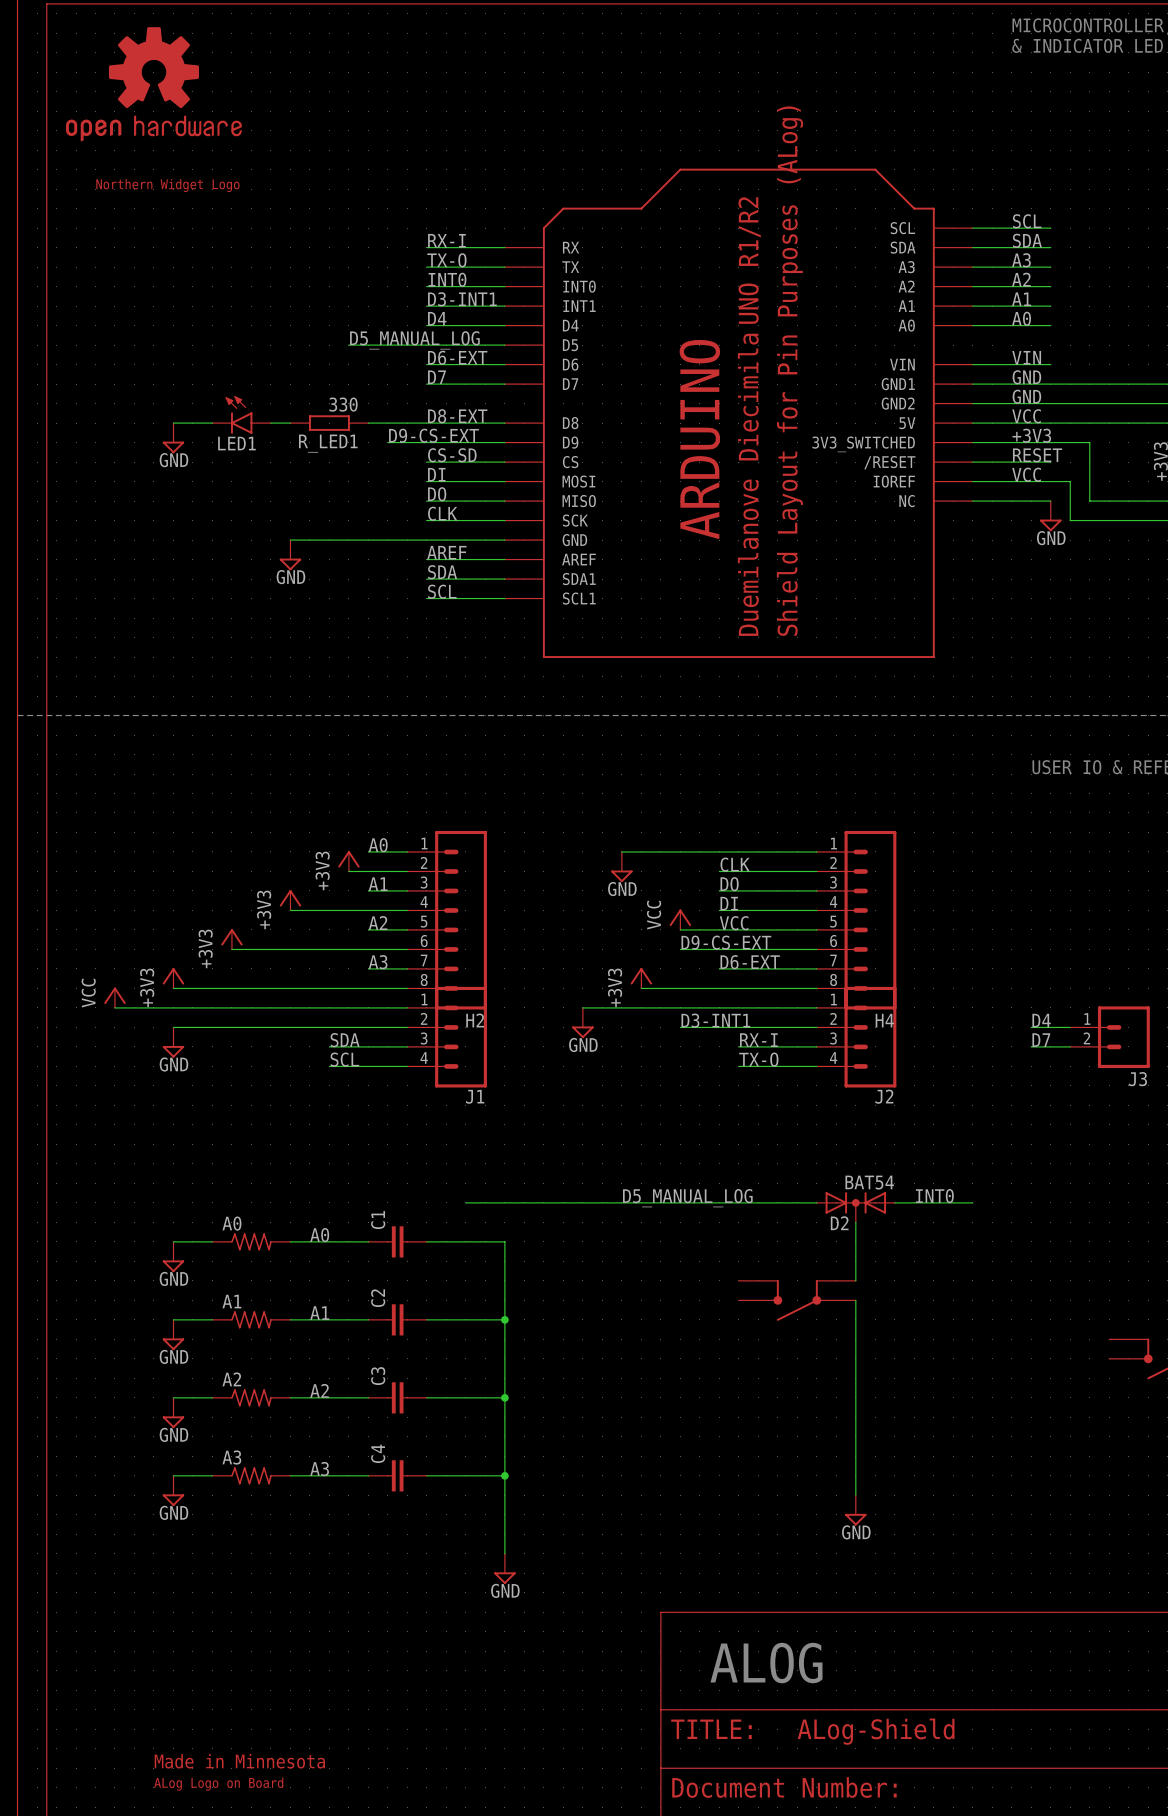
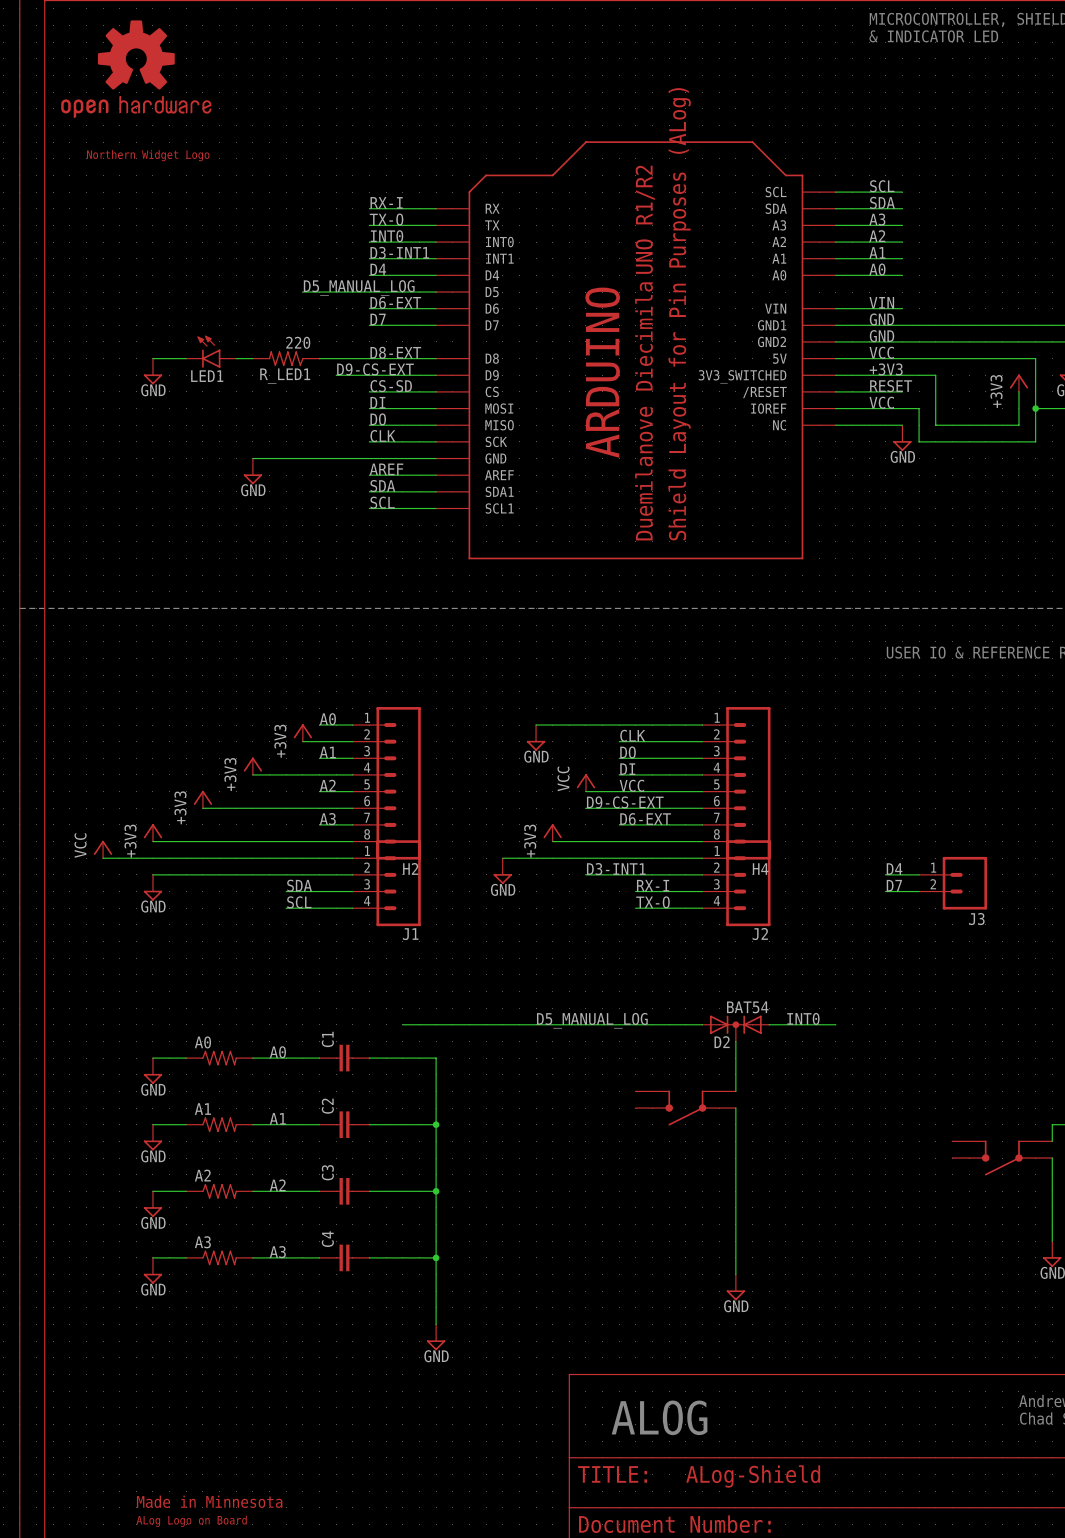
R_LED1 value: 330 (343, 404) -> 220 (298, 342)
R_LED1 symbol: [290, 415, 369, 431] -> [252, 351, 320, 366]

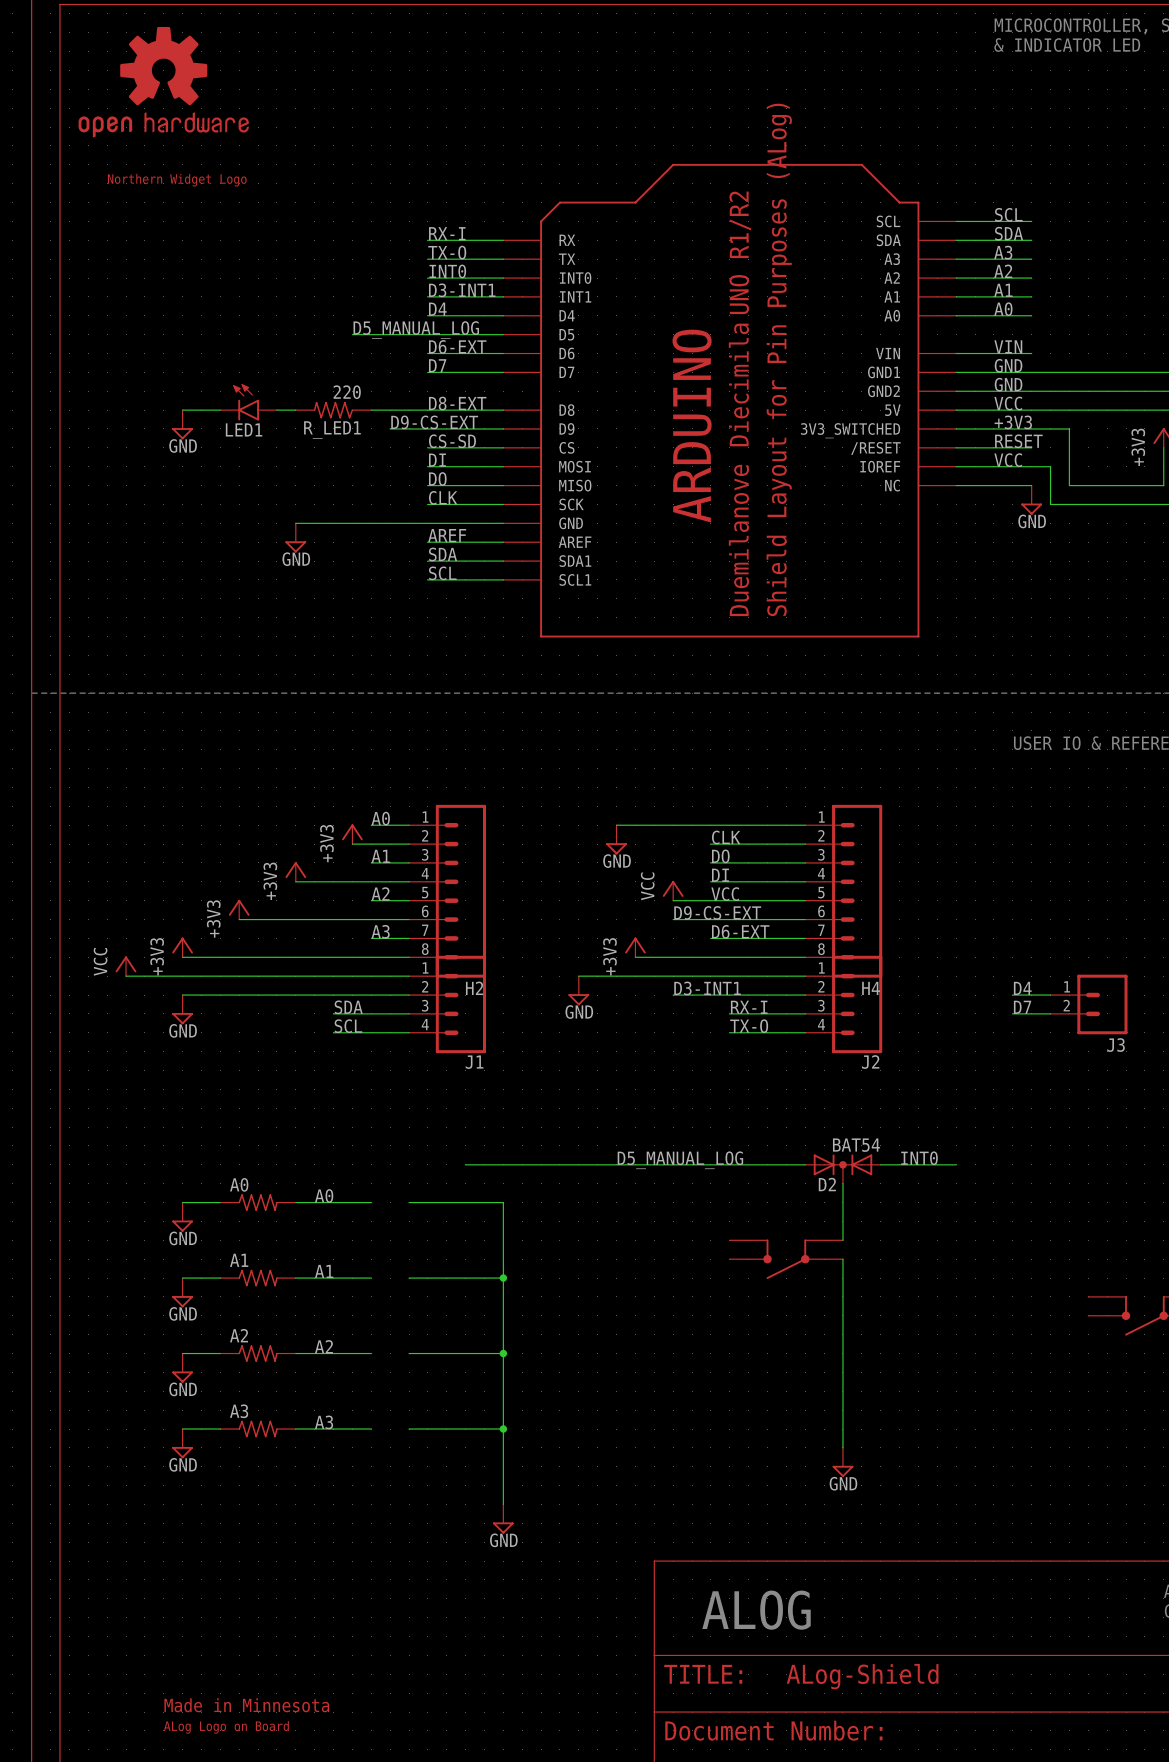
C1: (344, 1058) -> none
C2: (344, 1124) -> none
C3: (344, 1191) -> none
C4: (344, 1257) -> none

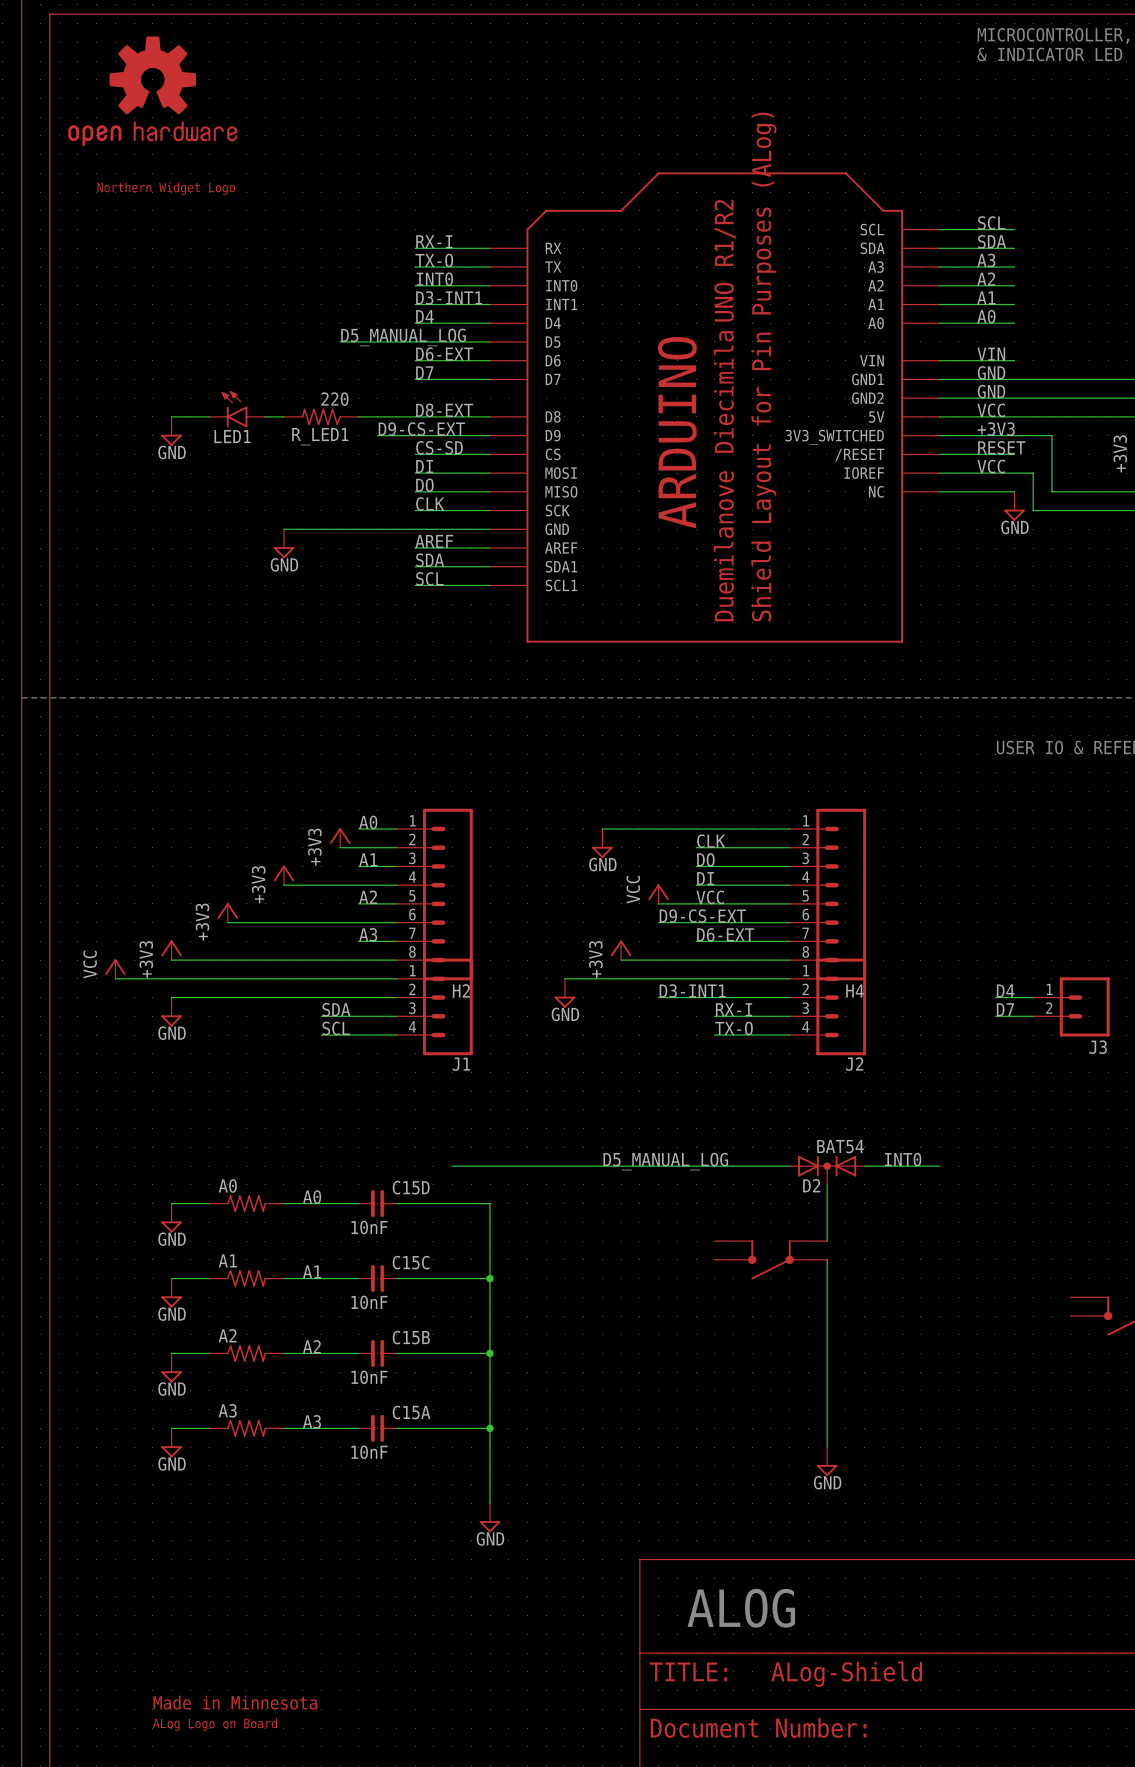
C15D: none -> 10nF (377, 1203)
C15C: none -> 10nF (377, 1278)
C15B: none -> 10nF (377, 1353)
C15A: none -> 10nF (377, 1428)

